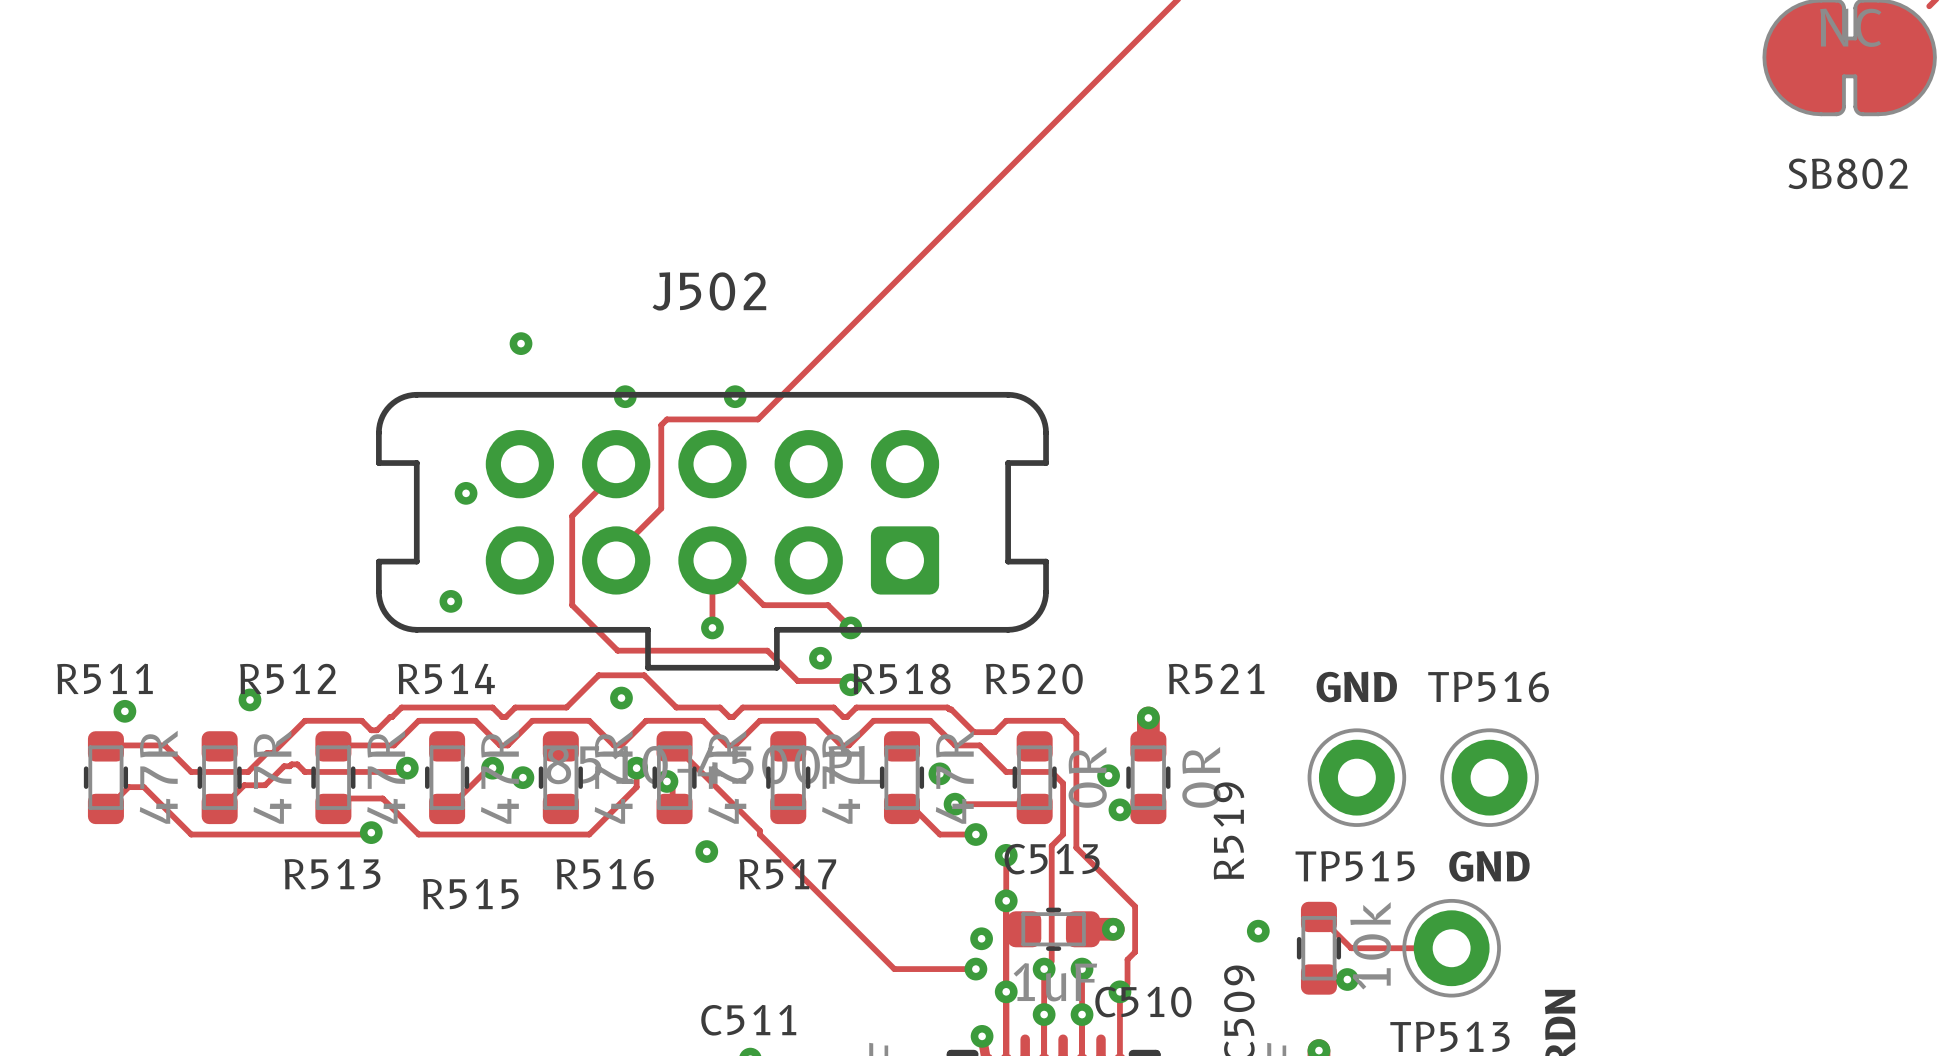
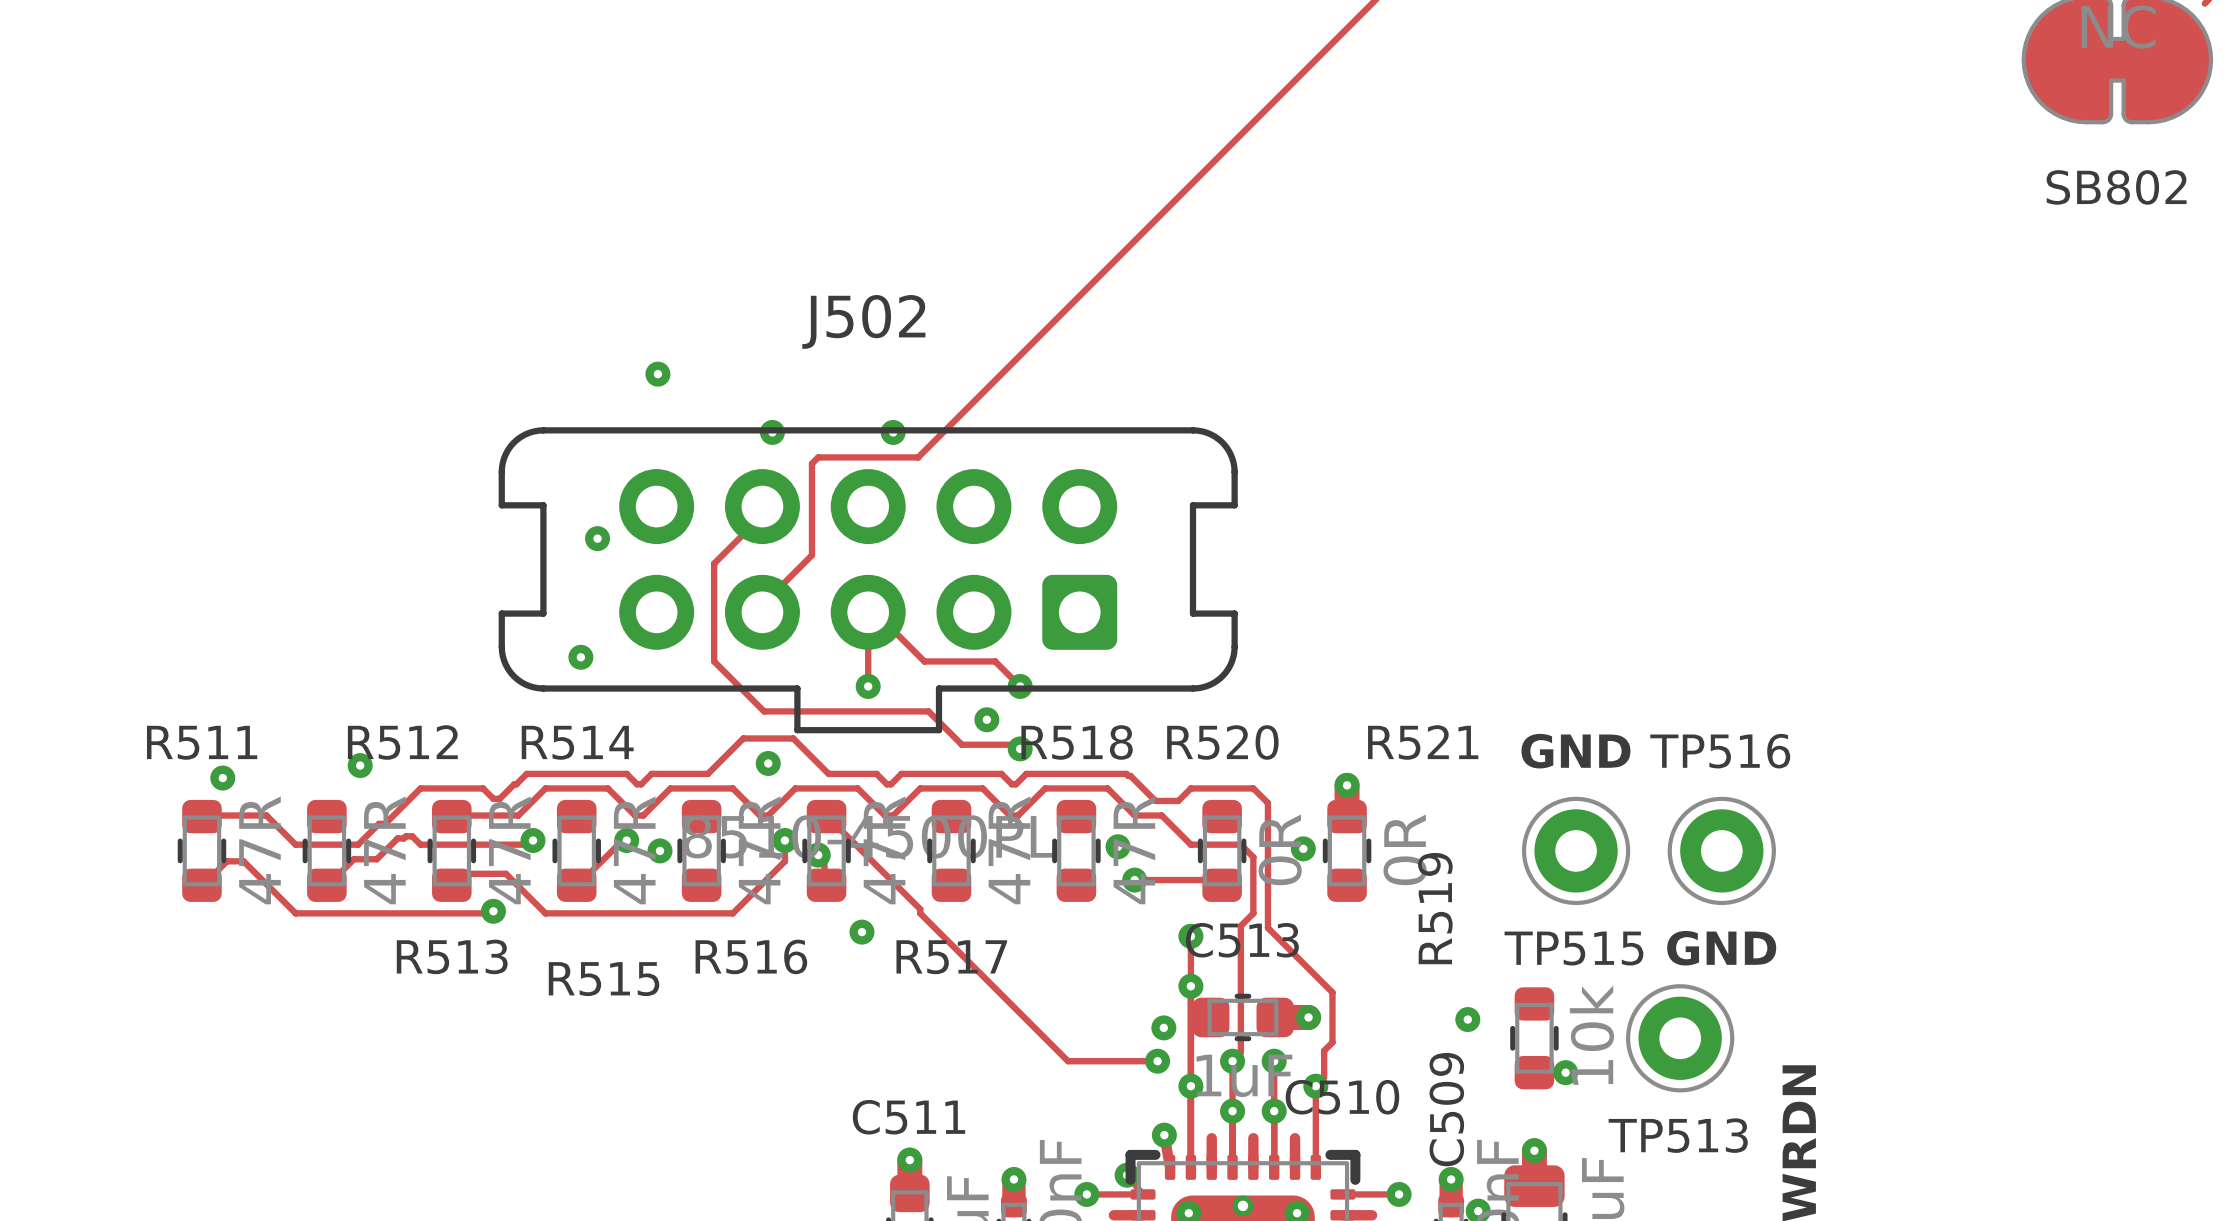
track: (903, 809) (915, 809) (939, 834) (975, 834) -> none
via: (1119, 809) -> none
via: (975, 834) -> none
track: (1320, 917) (1351, 948) (1449, 948) -> none

